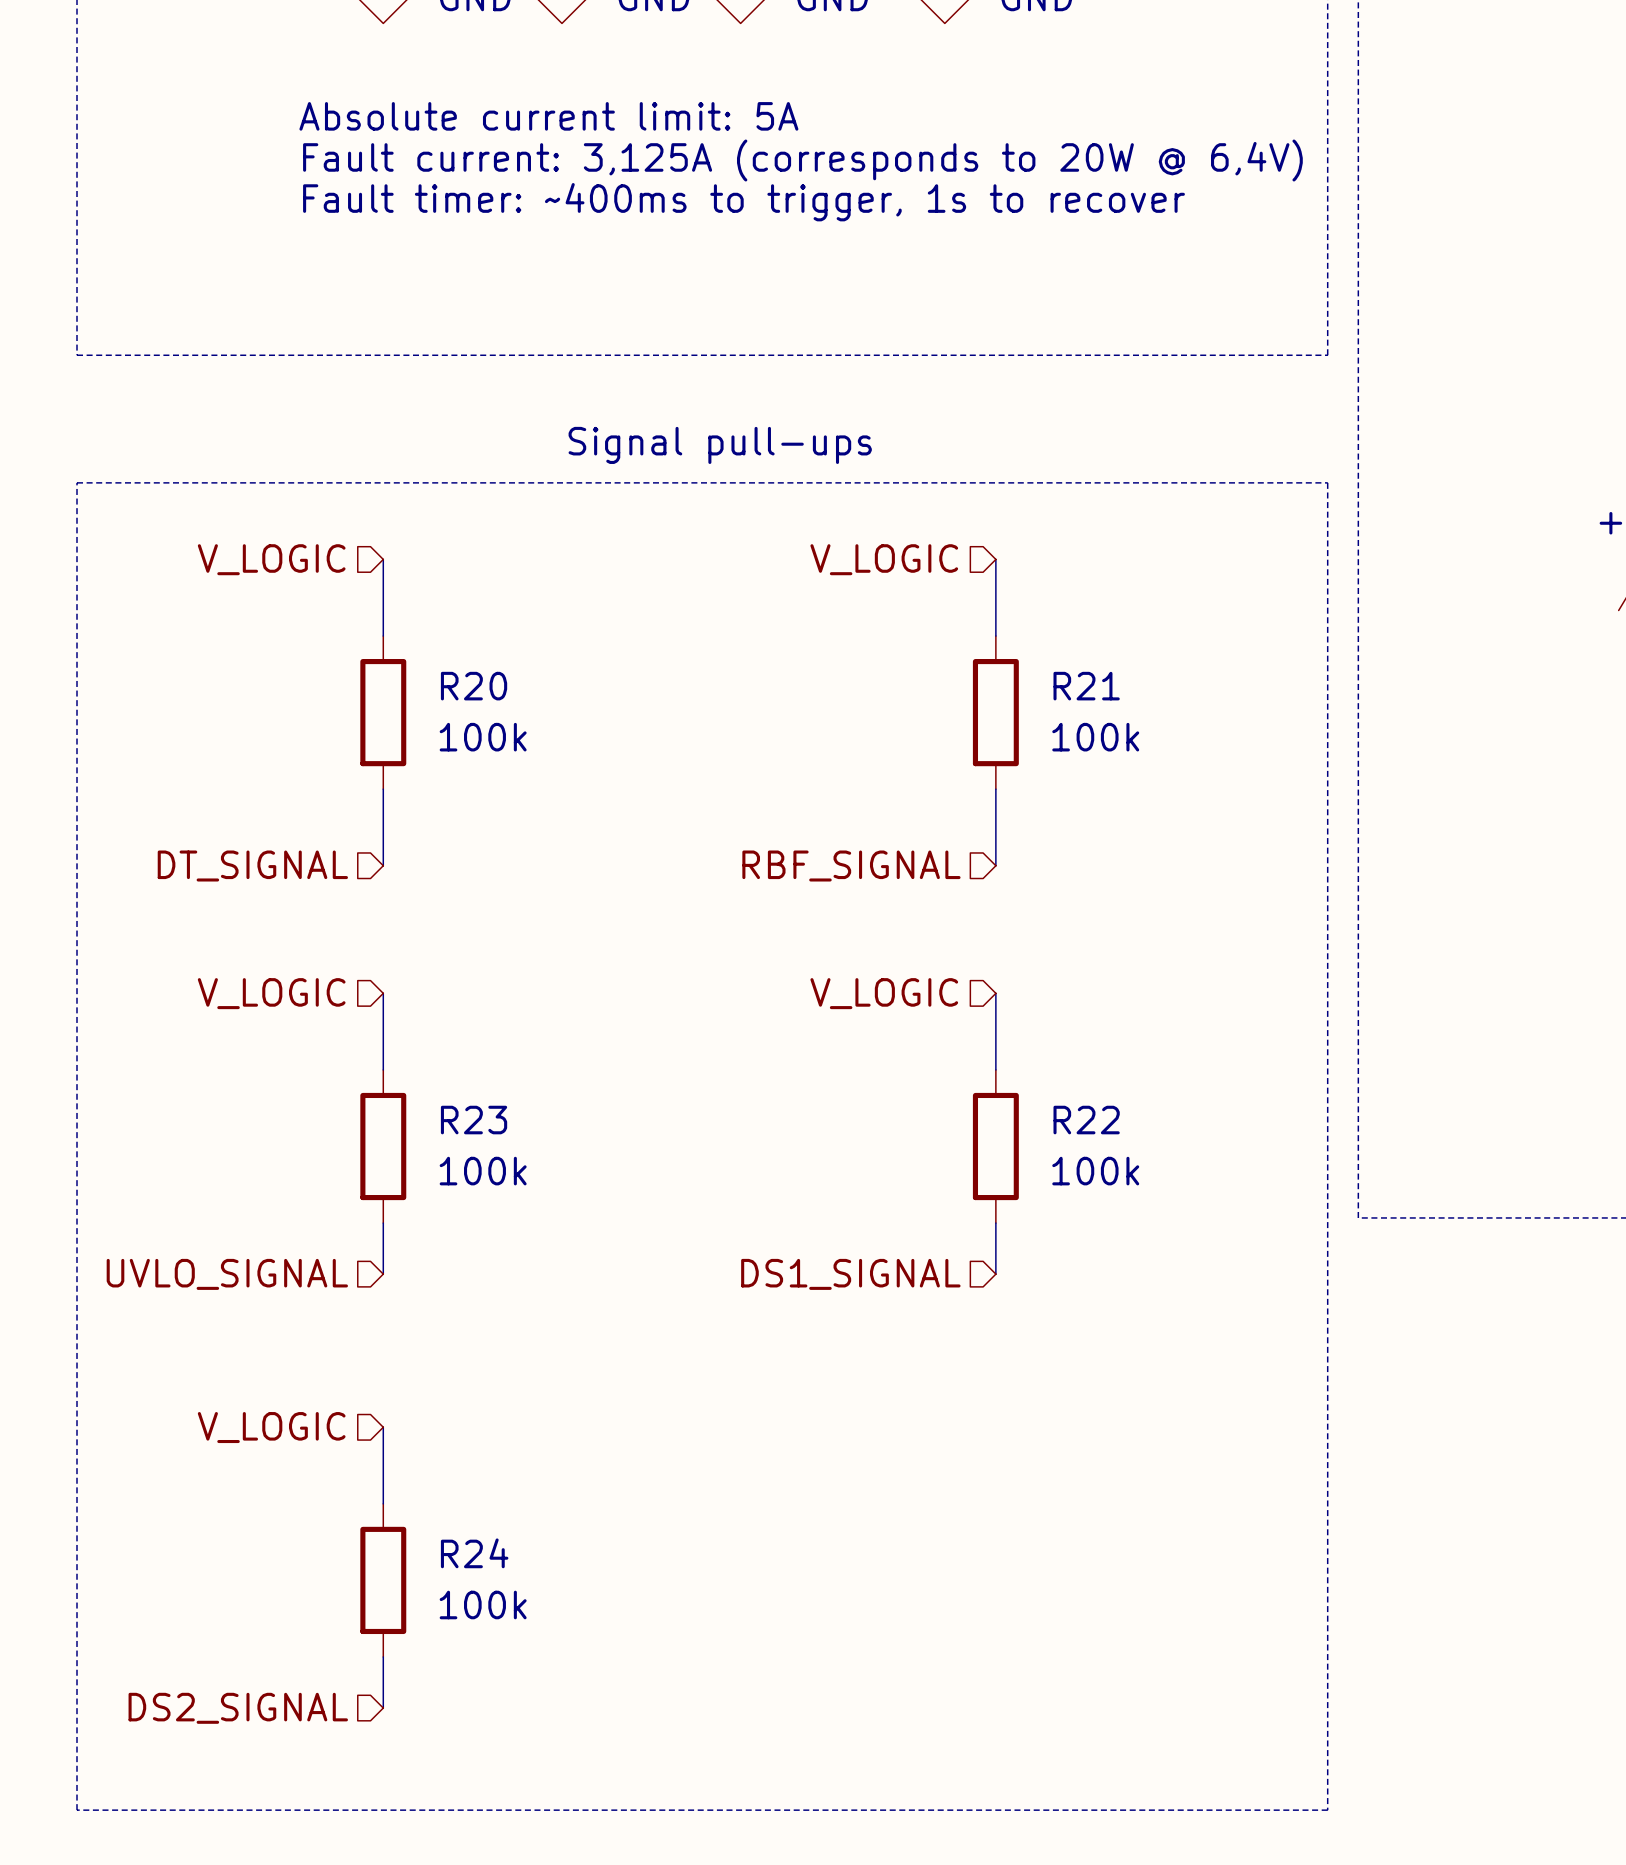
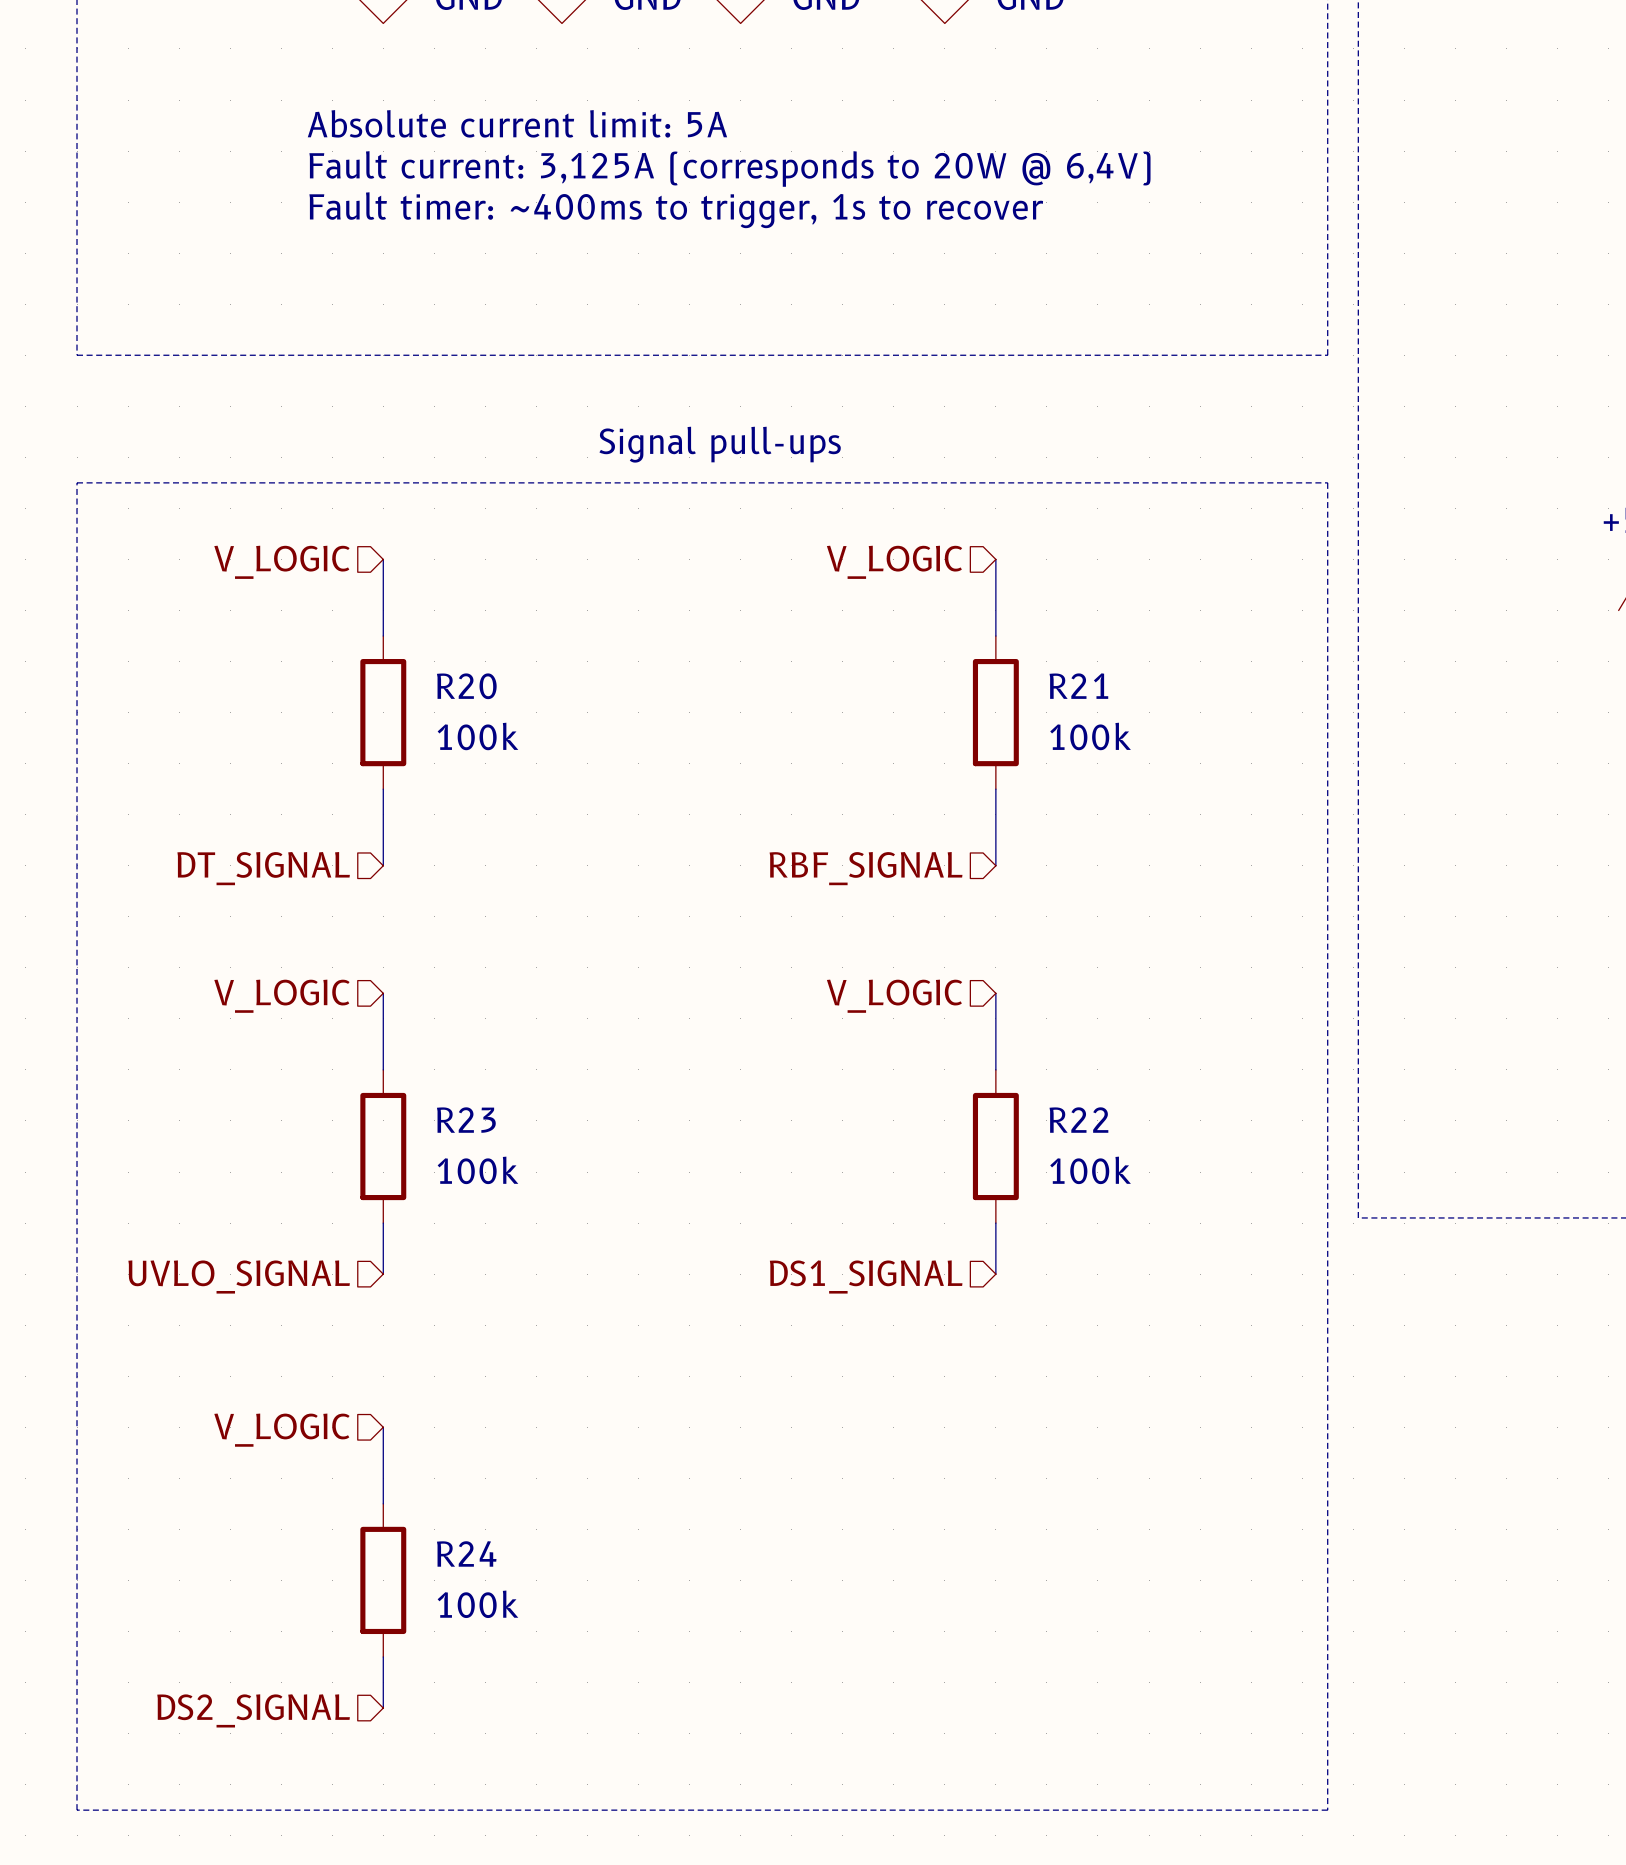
text position: Absolute current limit: 5A (548, 116) -> Absolute current limit: 5A (517, 123)
text position: Fault current: 3,125A (corresponds to 20W @ 6,4V) (802, 160) -> Fault current: 3,125A (corresponds to 20W @ 6,4V) (729, 168)
text position: Fault timer: ~400ms to trigger, 1s to recover (743, 202) -> Fault timer: ~400ms to trigger, 1s to recover (676, 210)

